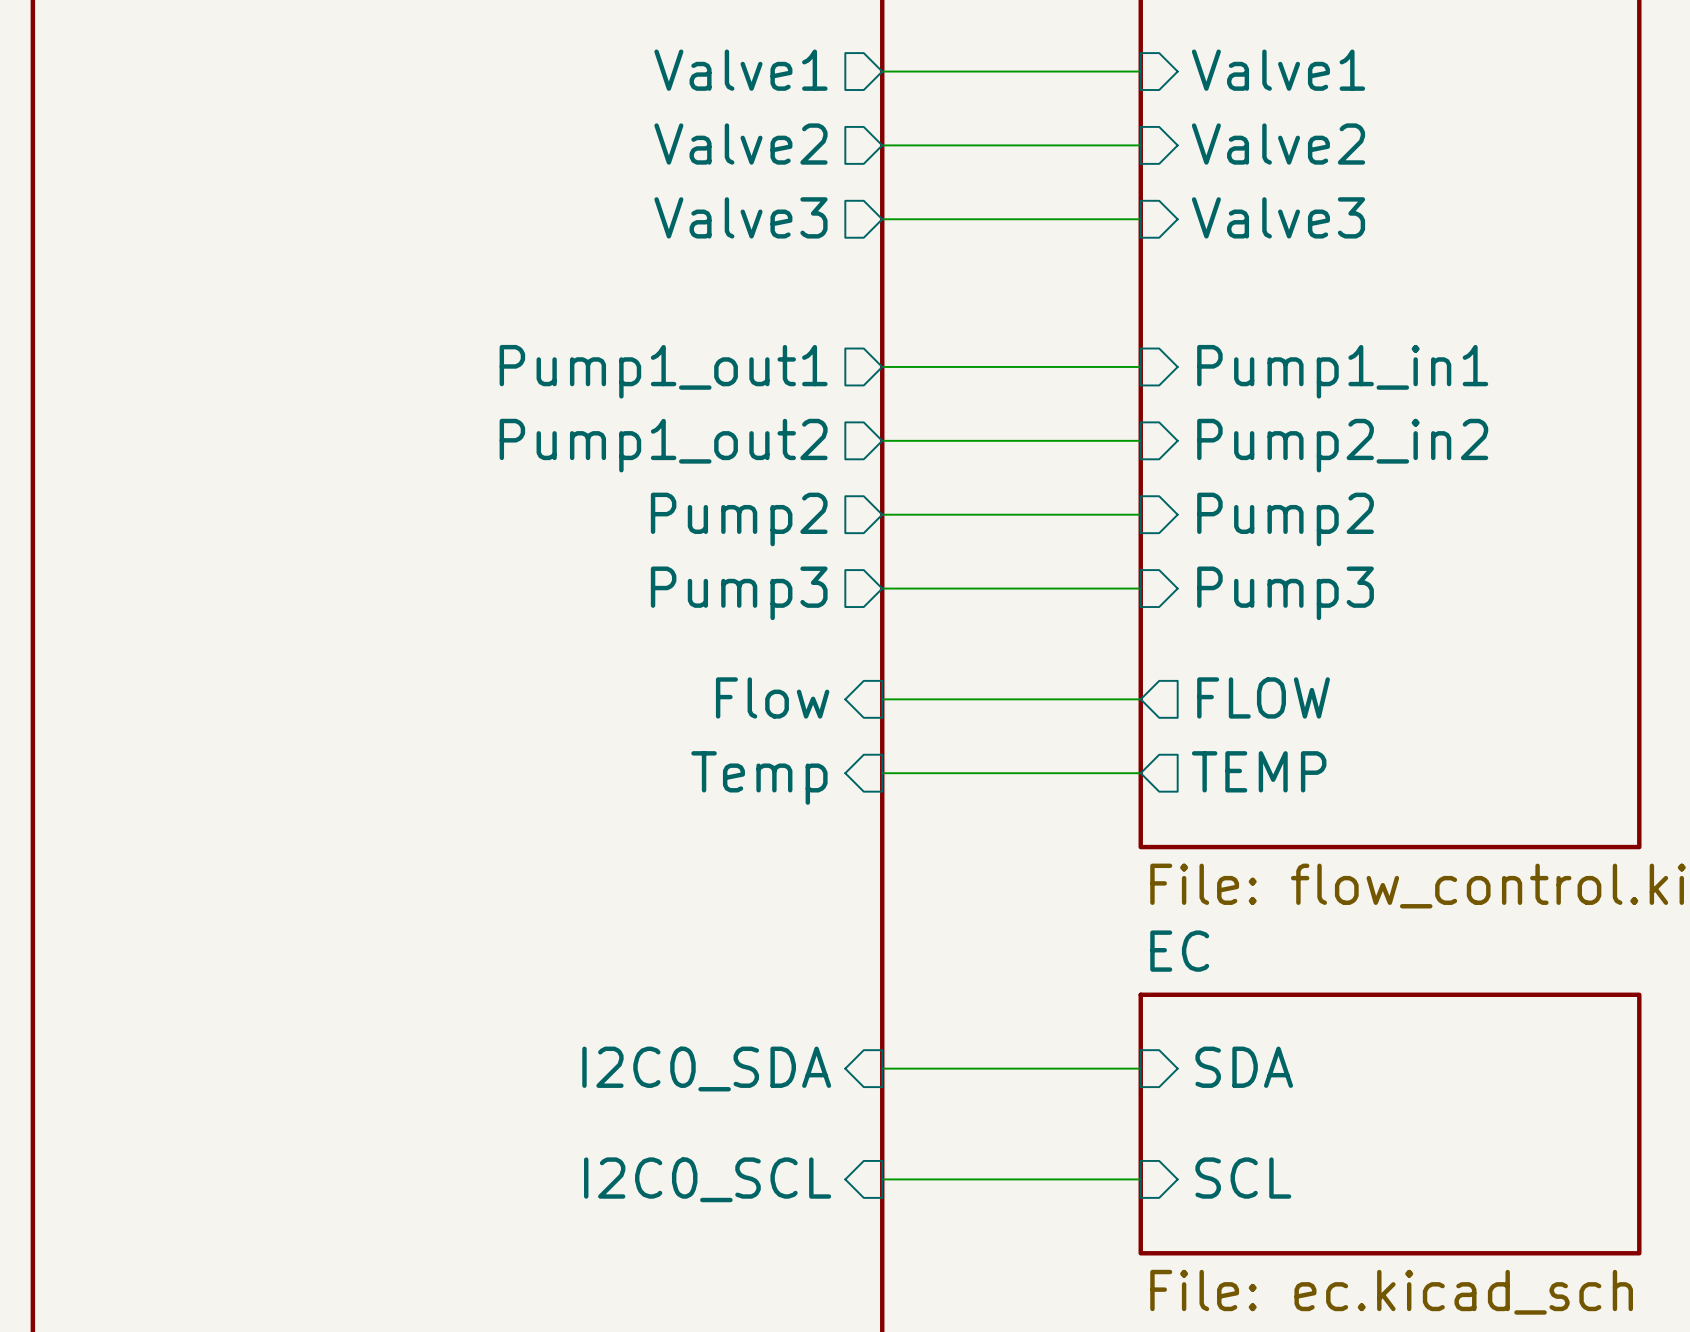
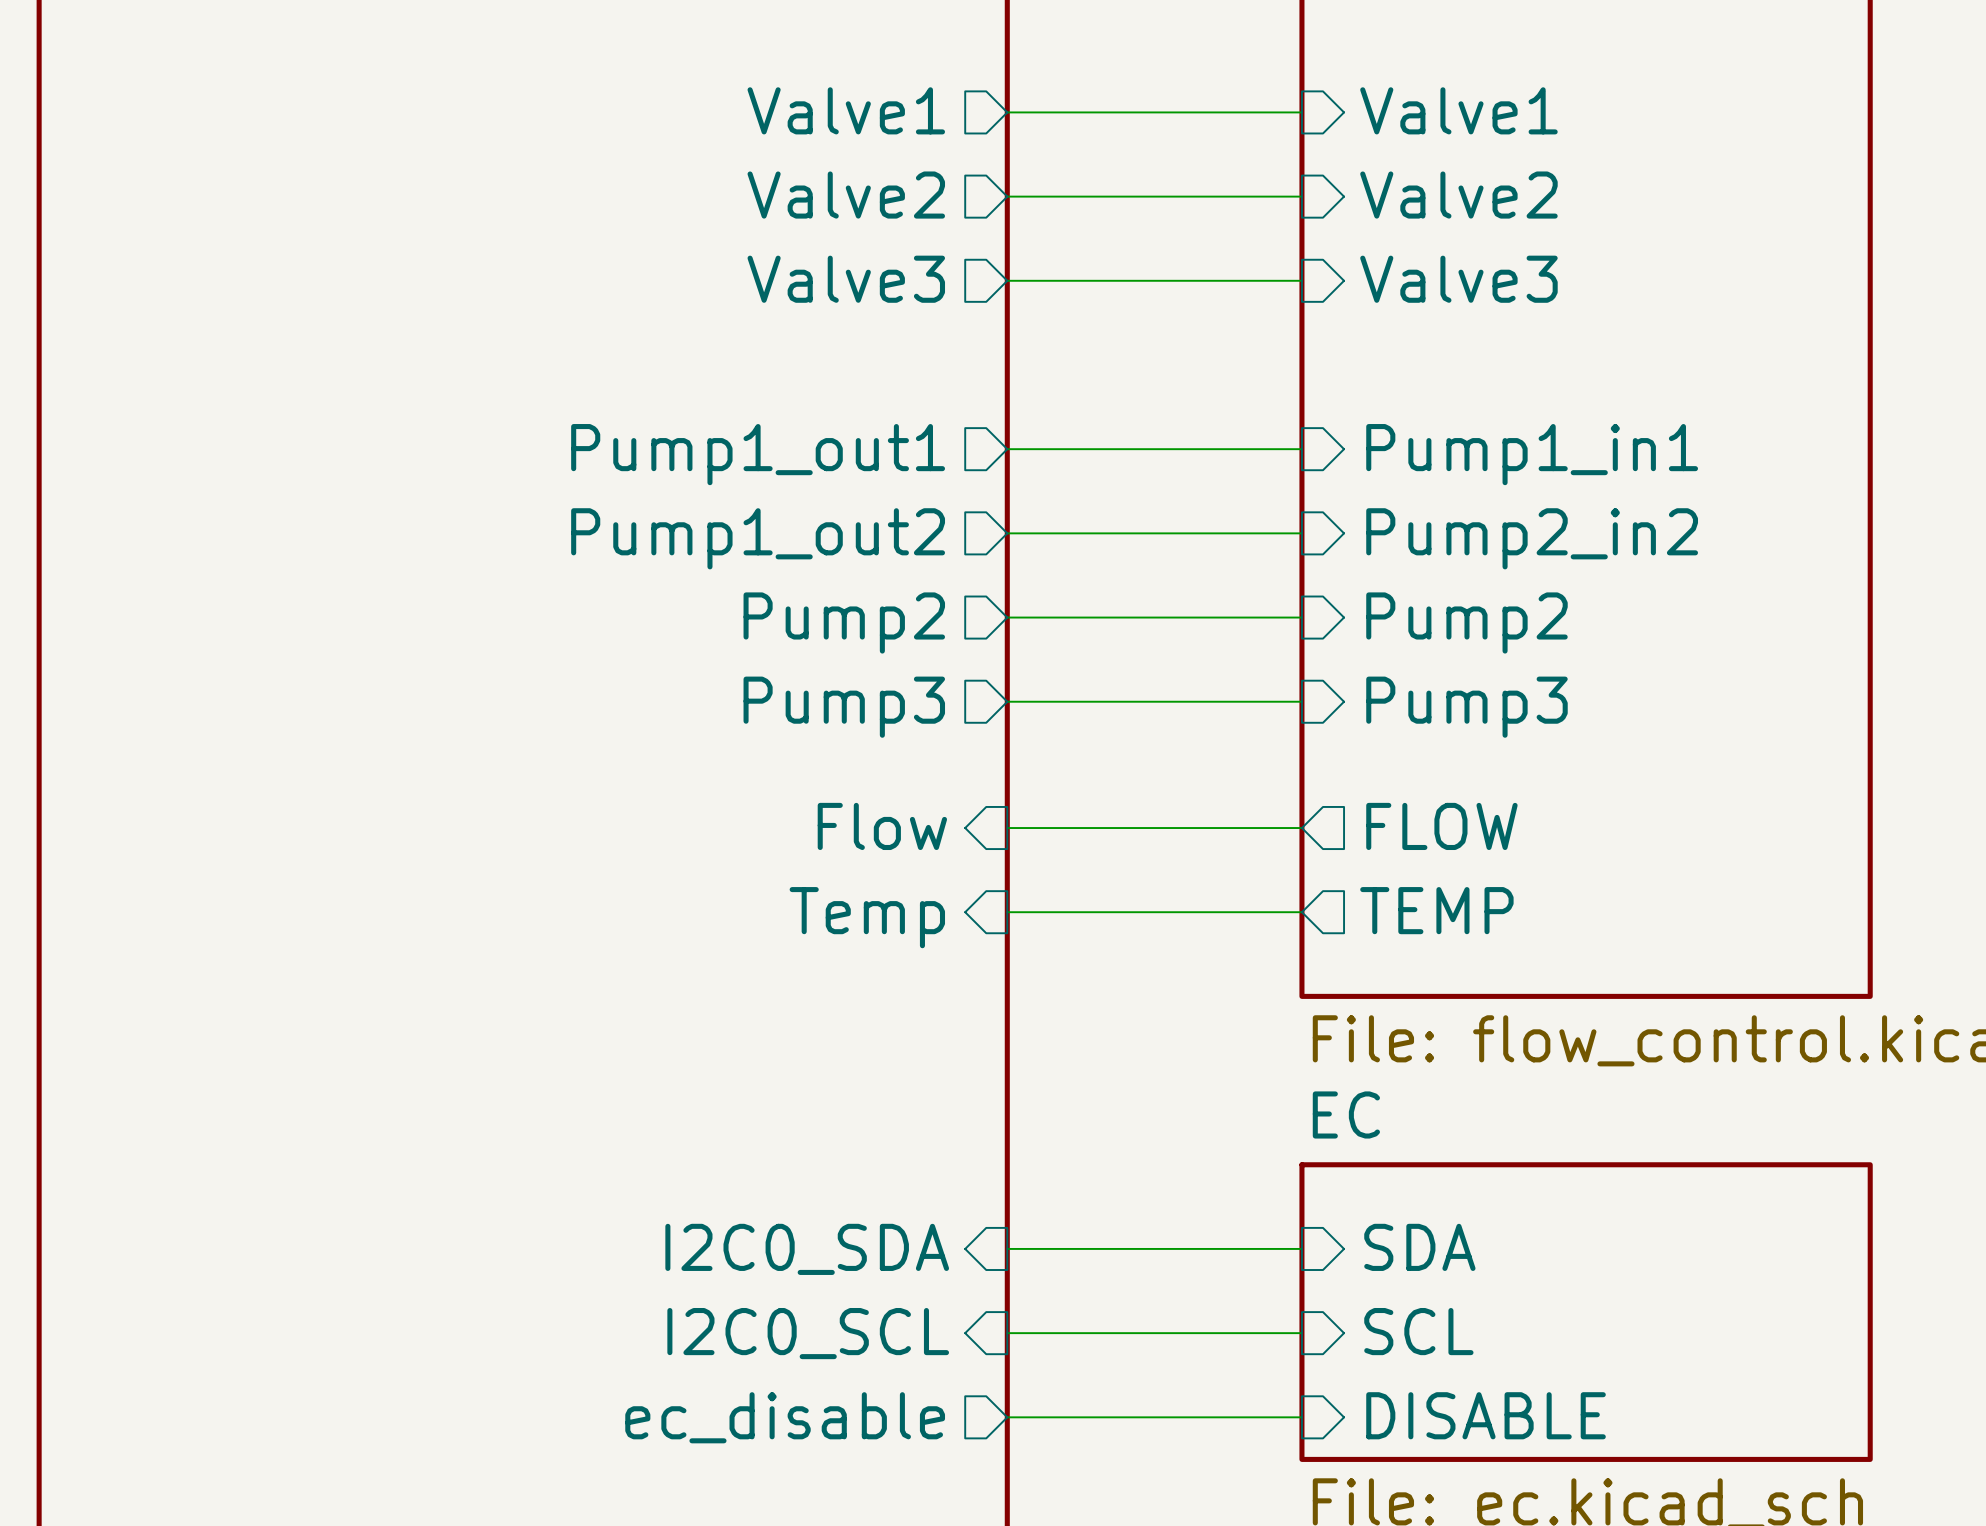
sheet pin position: SCL (1243, 1178) -> SCL (1418, 1331)
sheet pin position: I2C0_SCL (707, 1179) -> I2C0_SCL (808, 1333)
wire: (882, 1179) (1140, 1179) -> (1007, 1333) (1301, 1333)
sheet pin: none -> DISABLE (1486, 1415)
sheet pin: none -> ec_disable (785, 1417)
wire: none -> (1007, 1417) (1301, 1417)

